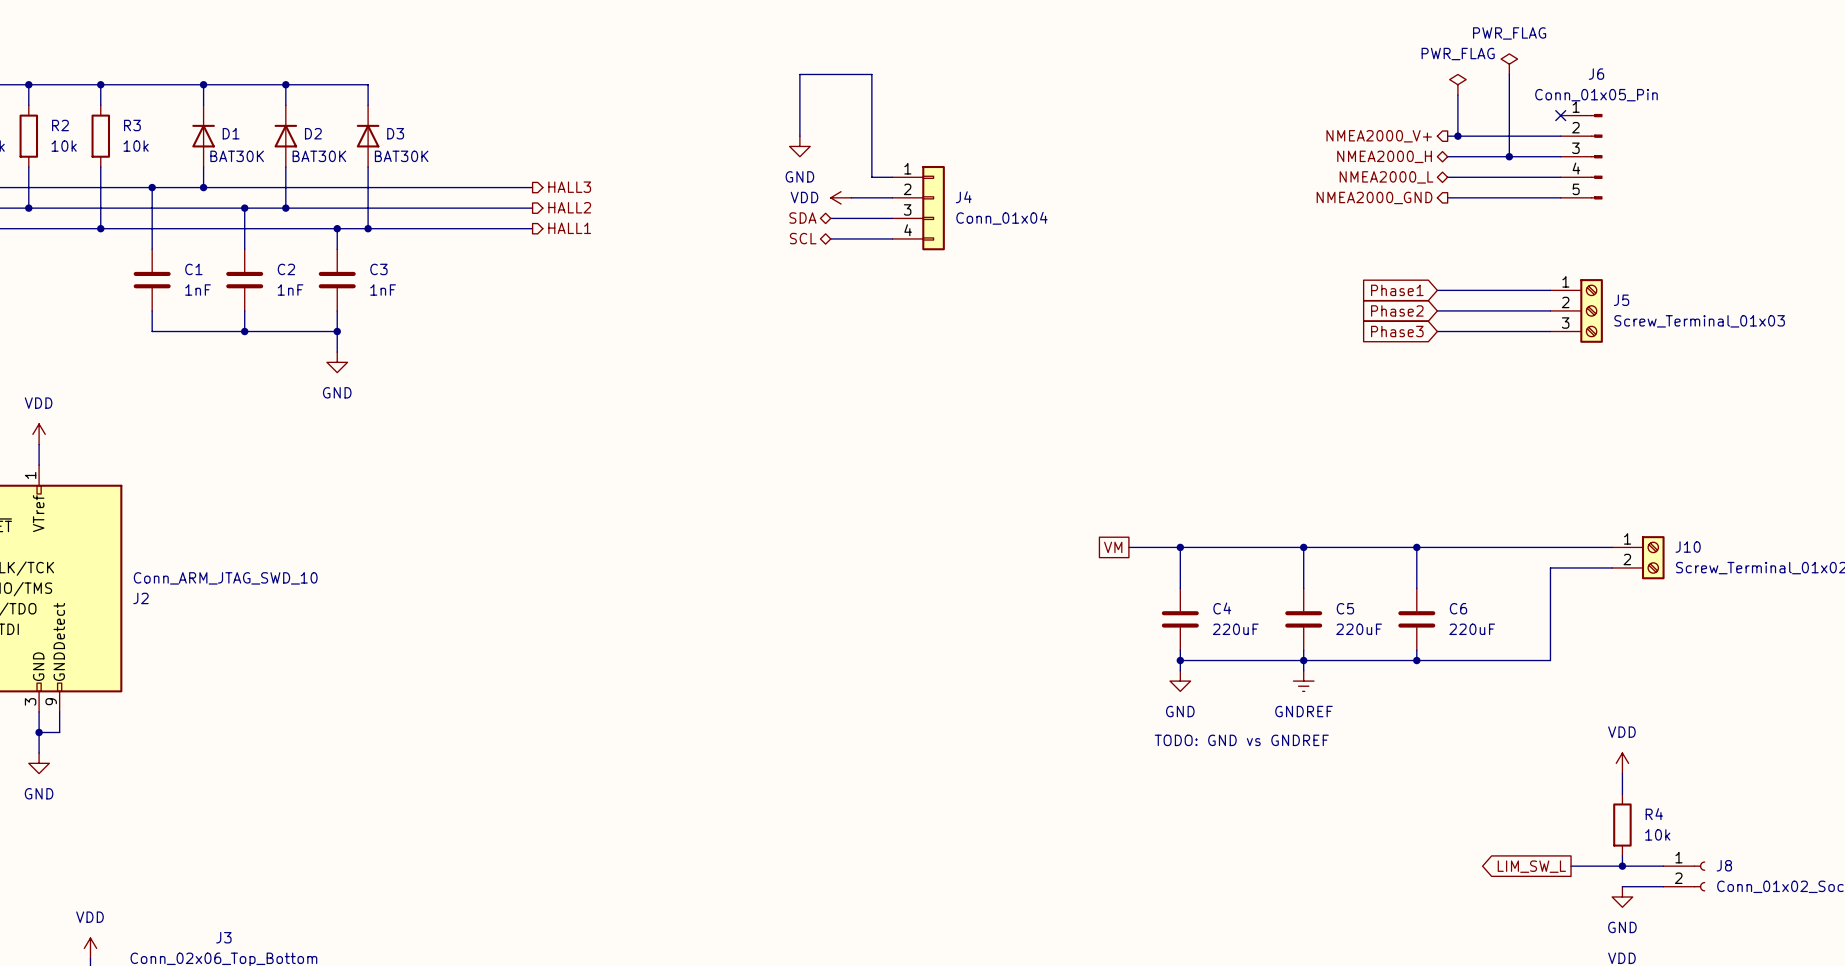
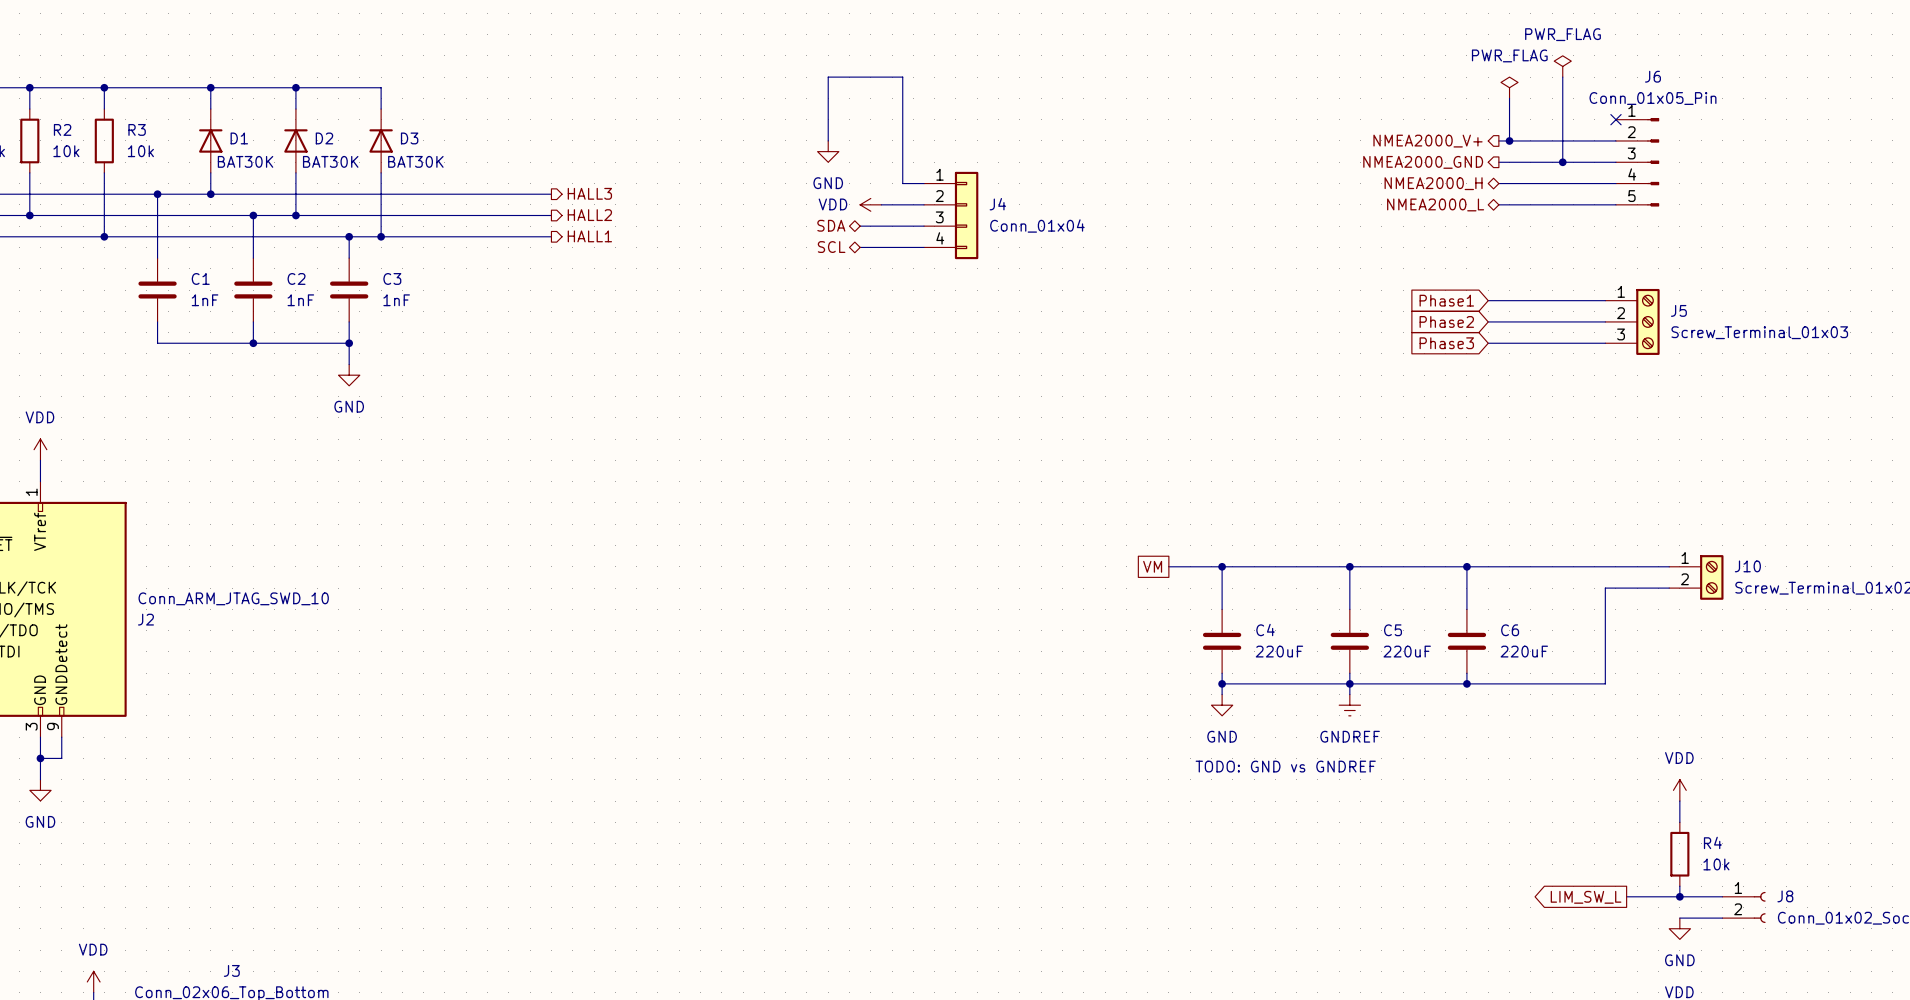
hierarchical label shape: bidirectional (1384, 156) -> output (1423, 162)
hierarchical label: NMEA2000_H (1384, 156) -> NMEA2000_GND (1423, 162)
hierarchical label: NMEA2000_L (1386, 177) -> NMEA2000_H (1433, 183)
hierarchical label shape: output (1374, 197) -> bidirectional (1435, 204)
hierarchical label: NMEA2000_GND (1374, 197) -> NMEA2000_L (1435, 204)

